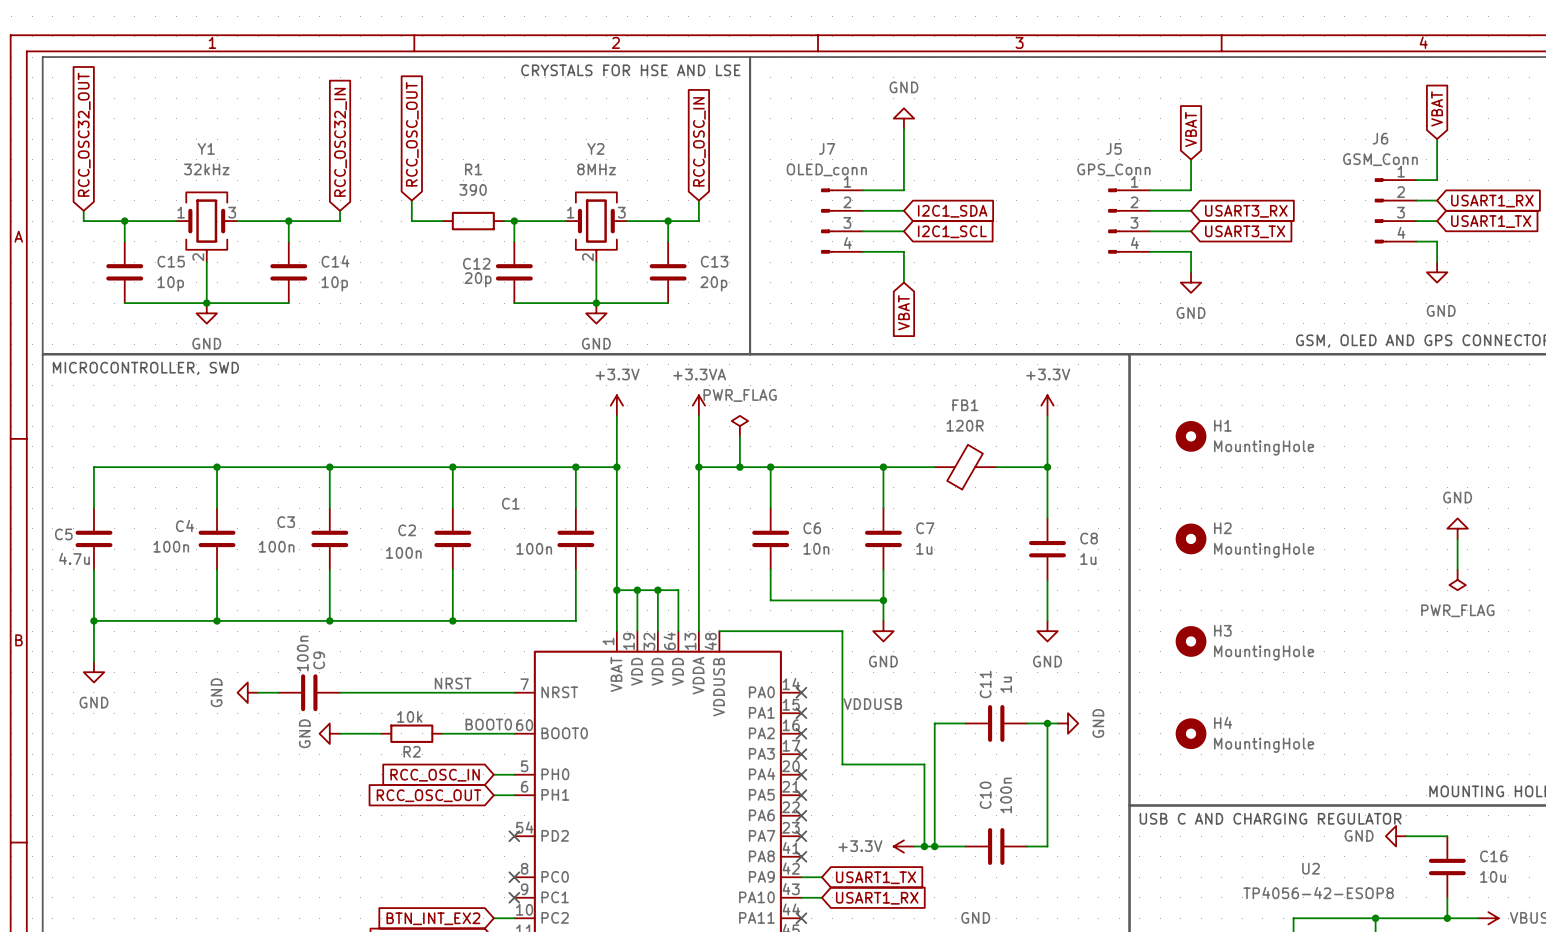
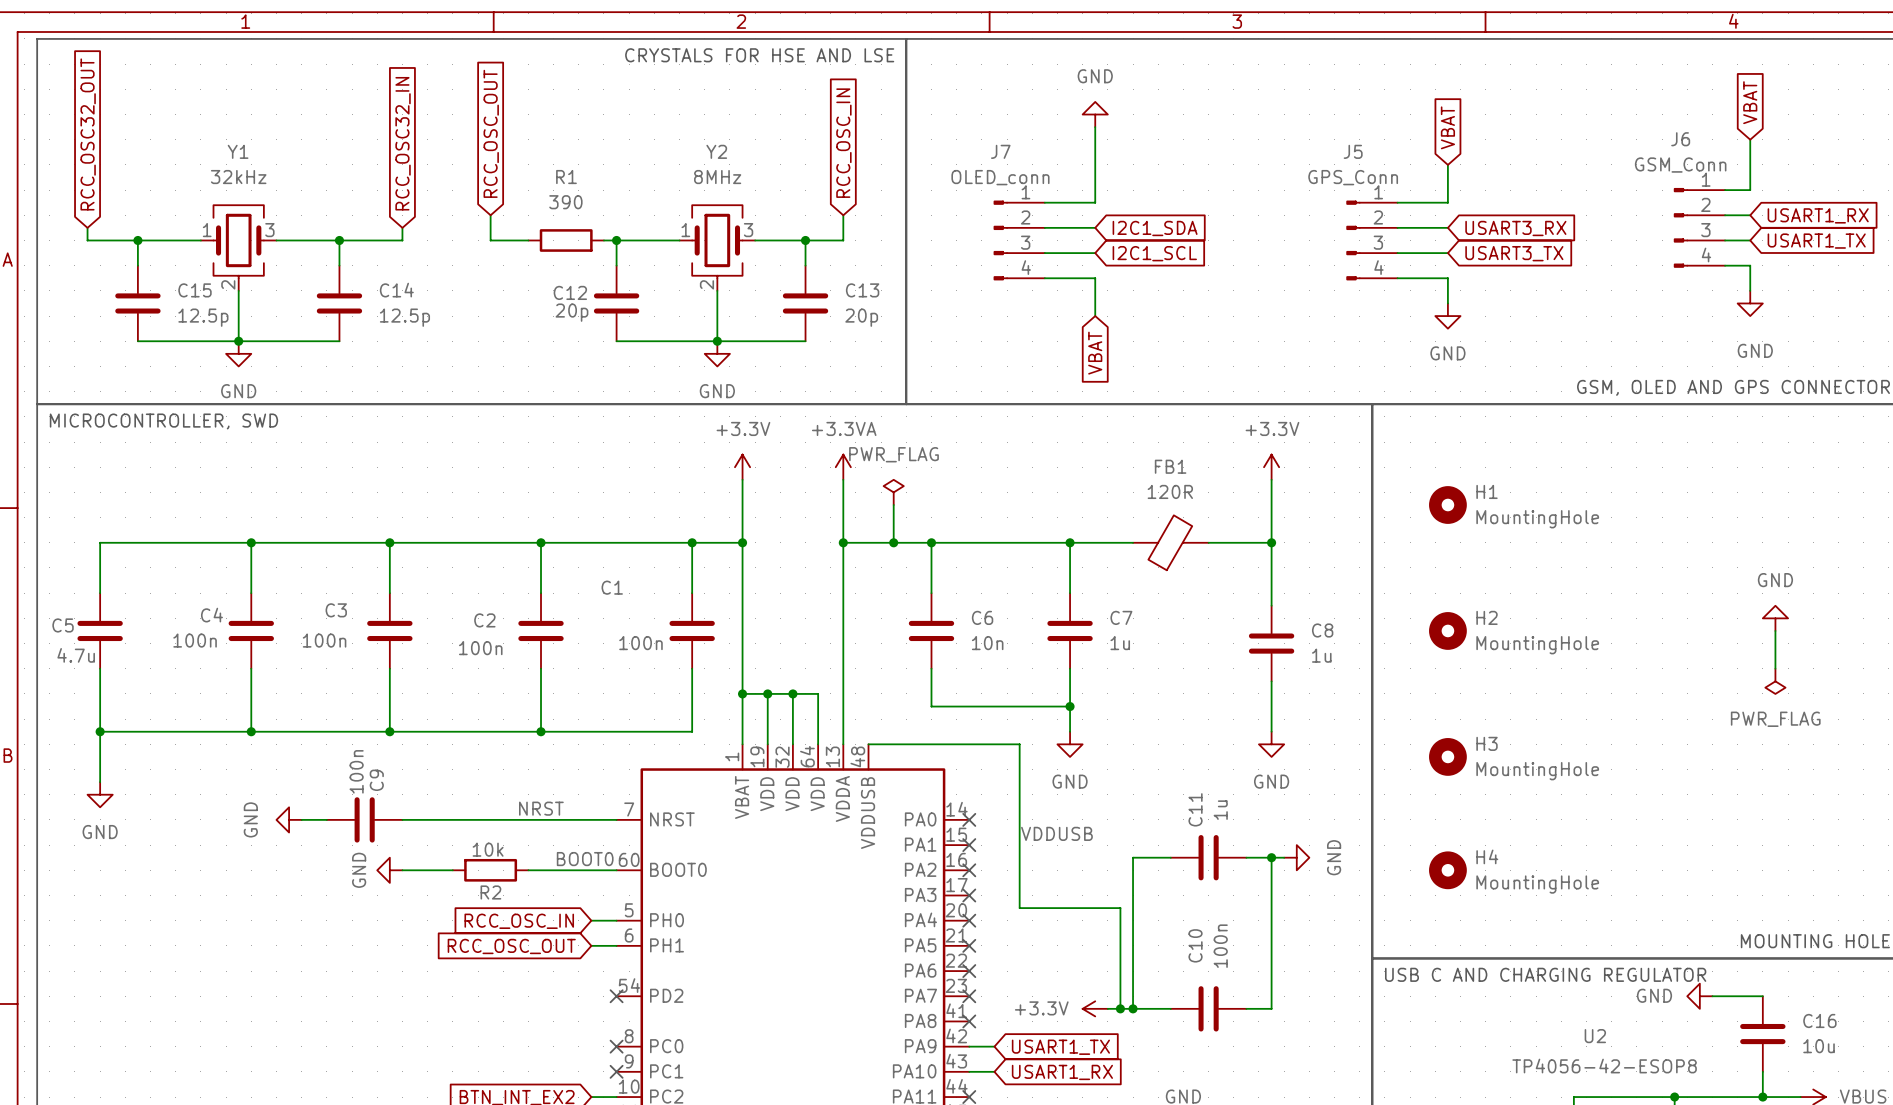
C15 value: 10p (170, 283) -> 12.5p (203, 317)
C14 value: 10p (334, 283) -> 12.5p (404, 317)

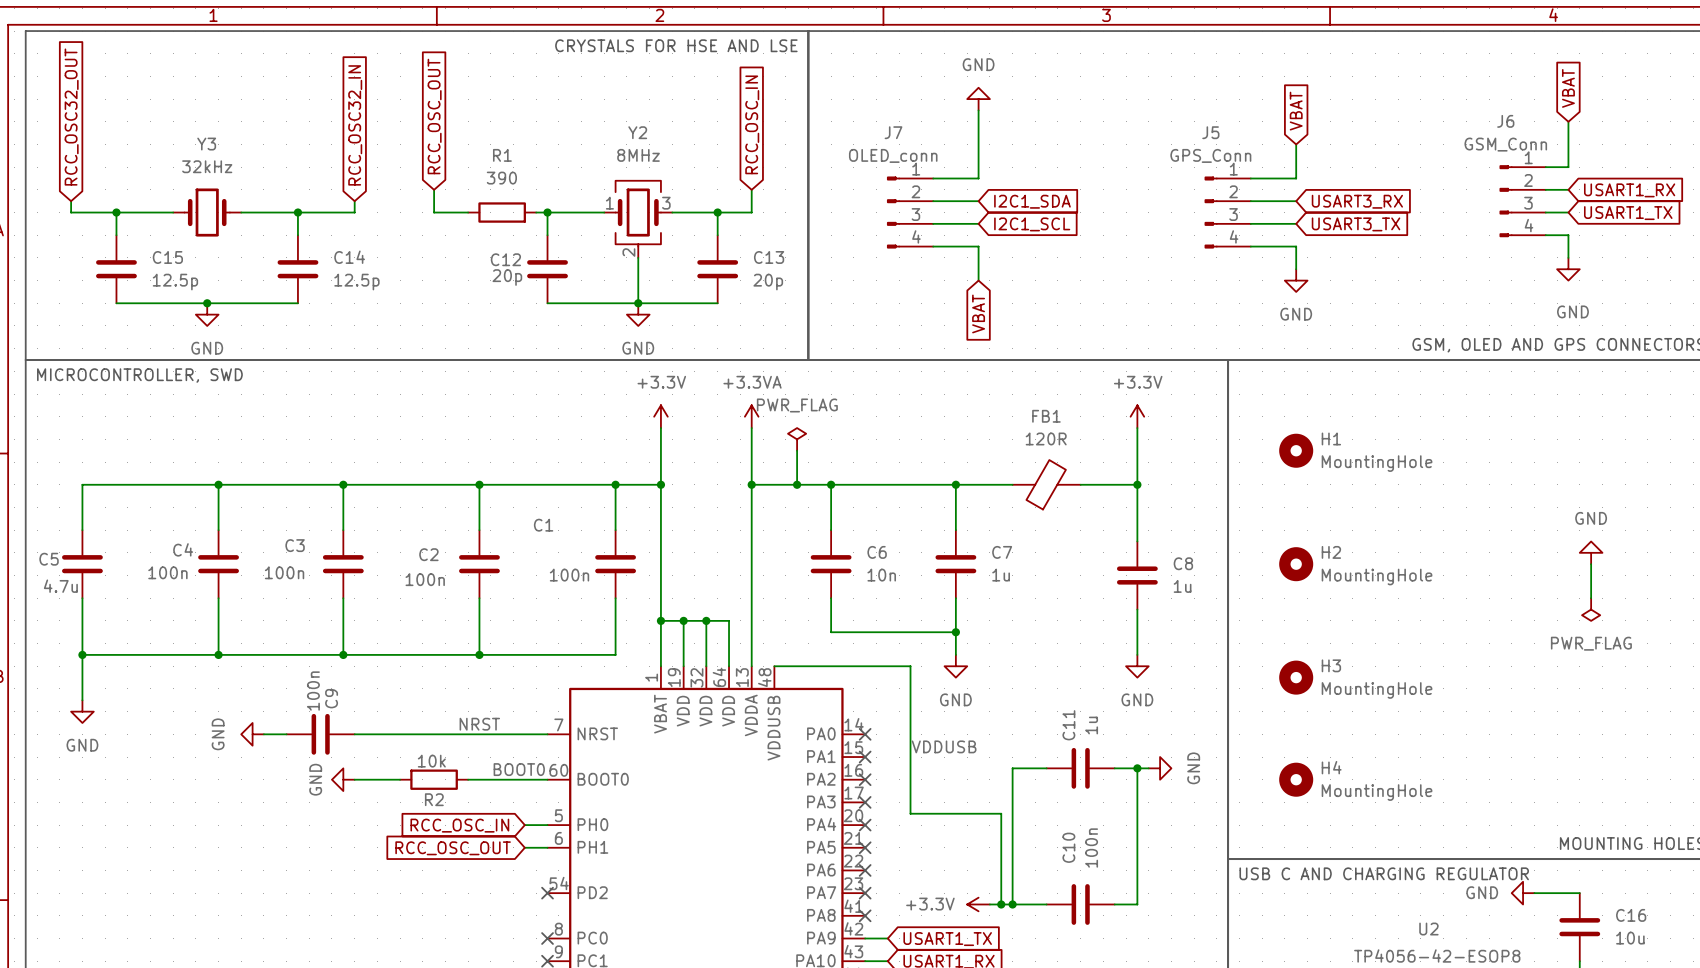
Y3: none -> 32kHz (207, 212)
Y1: 32kHz (238, 248) -> none
wire: (238, 290) (238, 341) -> none

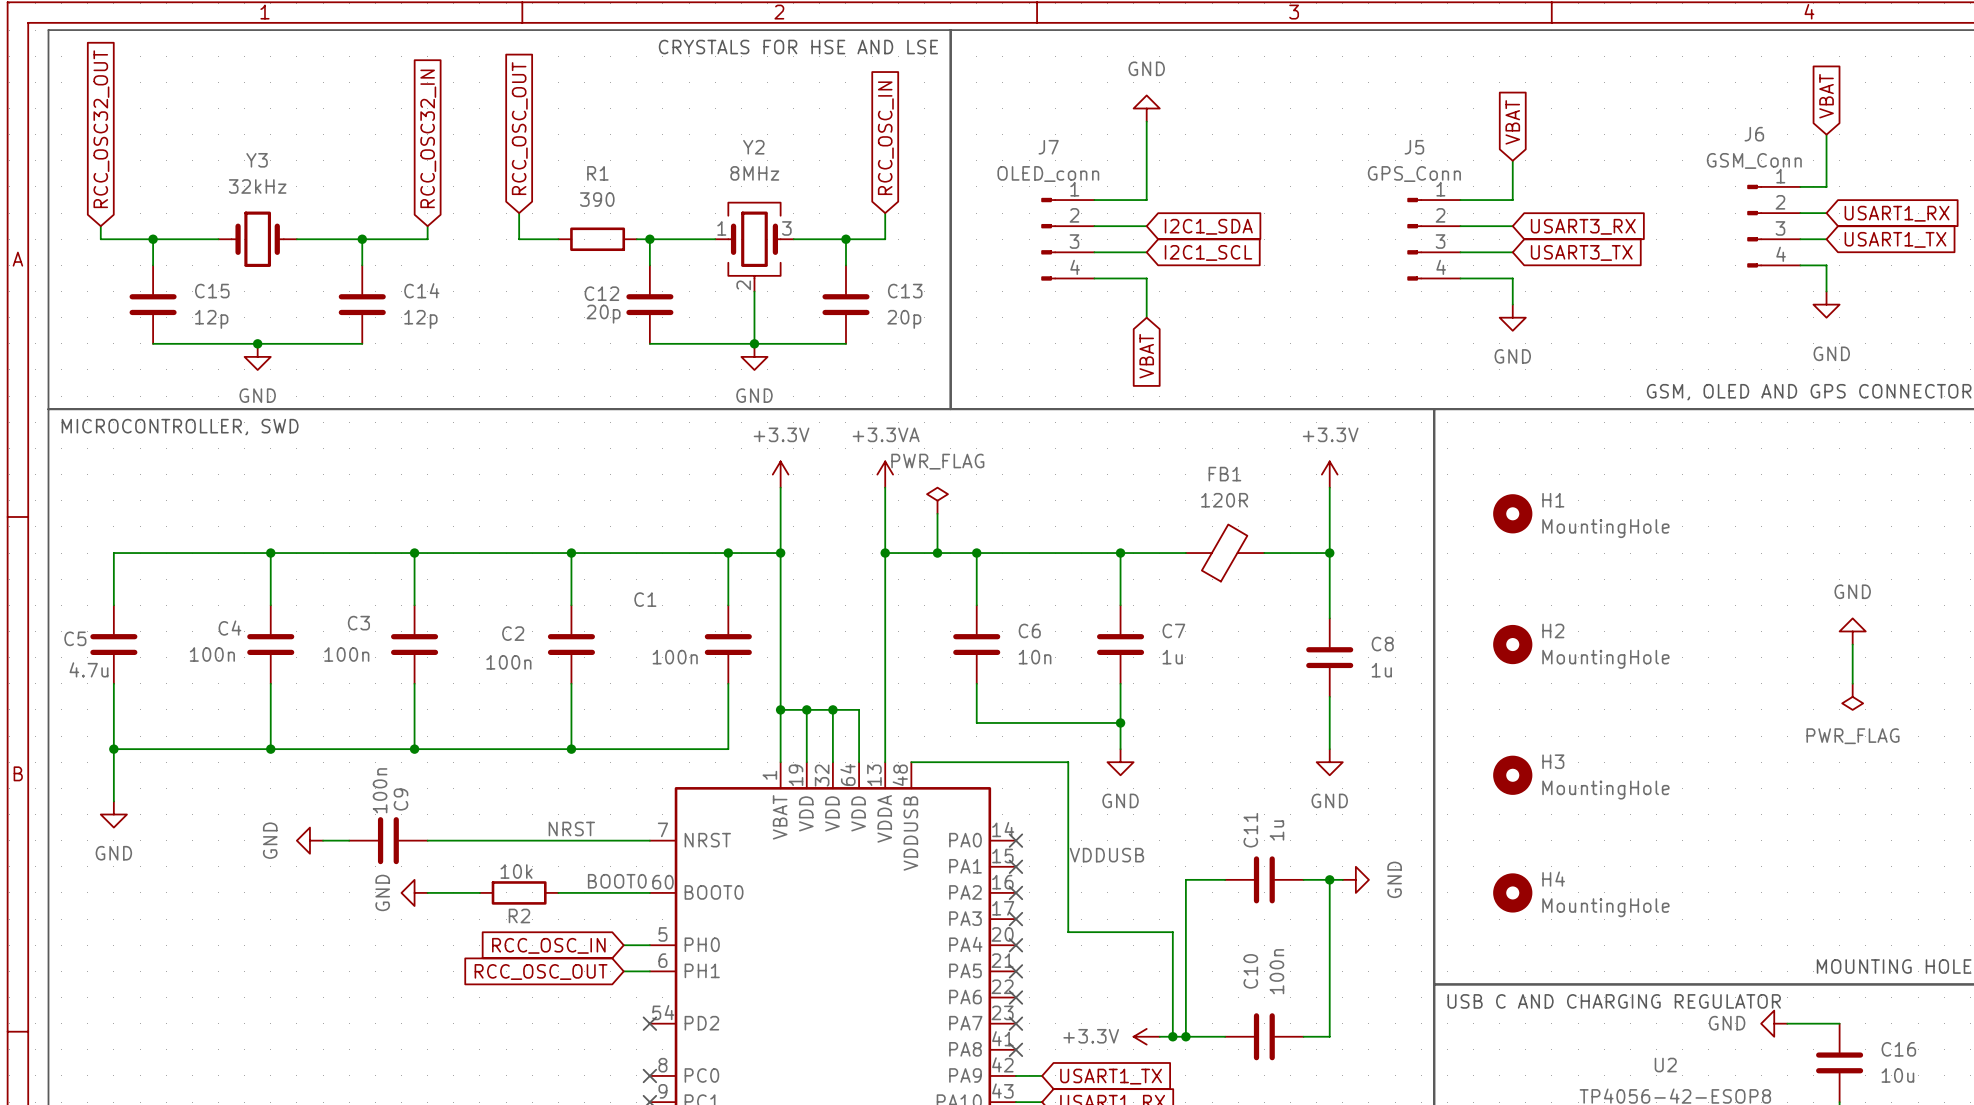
C15 value: 12.5p (175, 282) -> 12p (211, 319)
C14 value: 12.5p (356, 282) -> 12p (420, 319)

